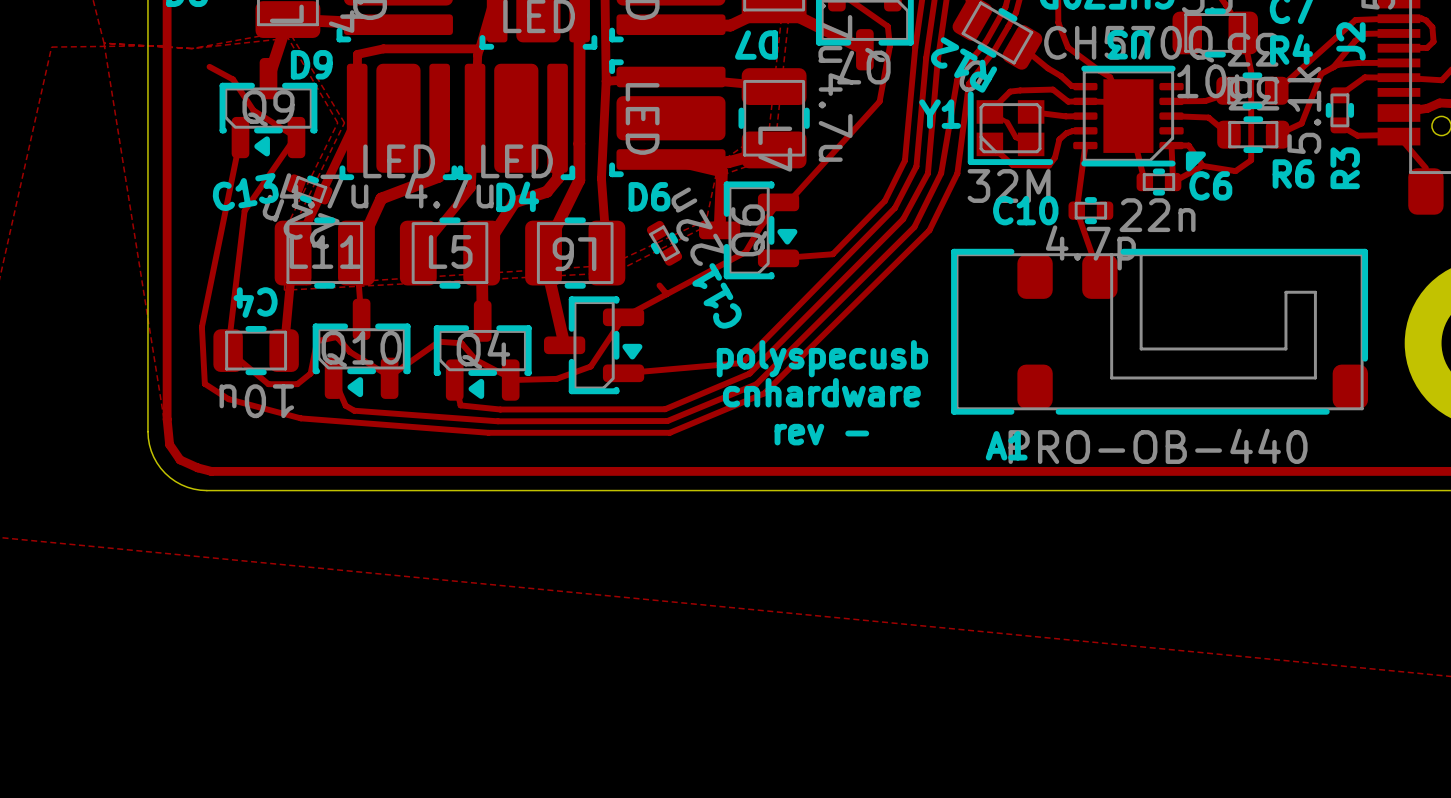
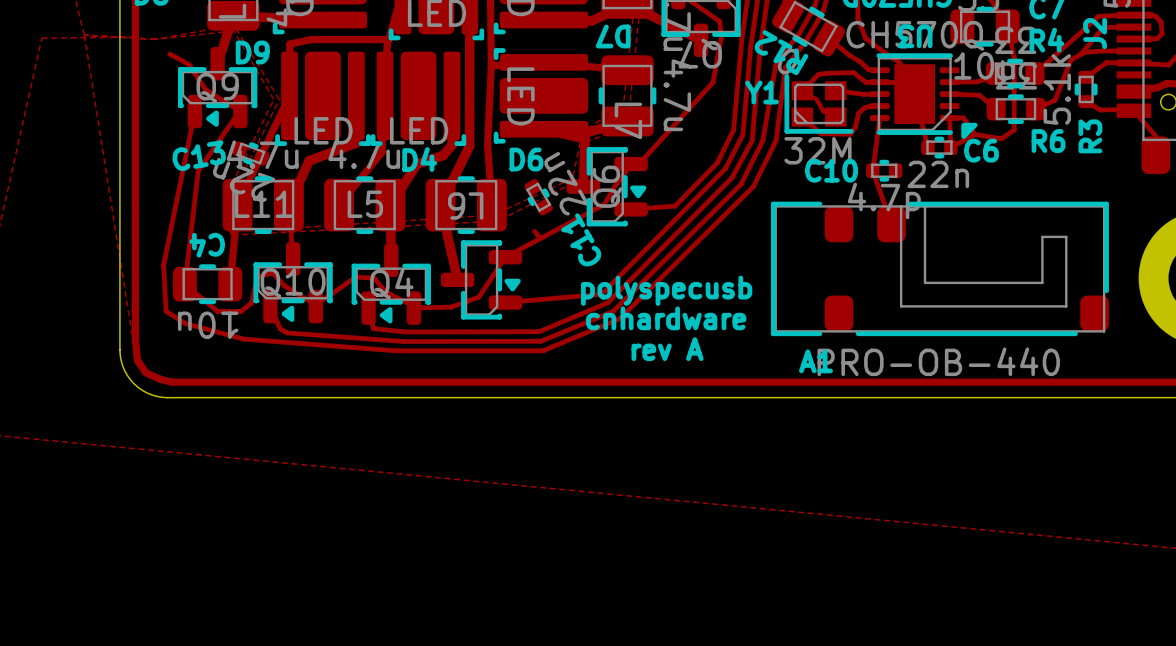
text: rev - (821, 434) -> rev A (667, 349)

